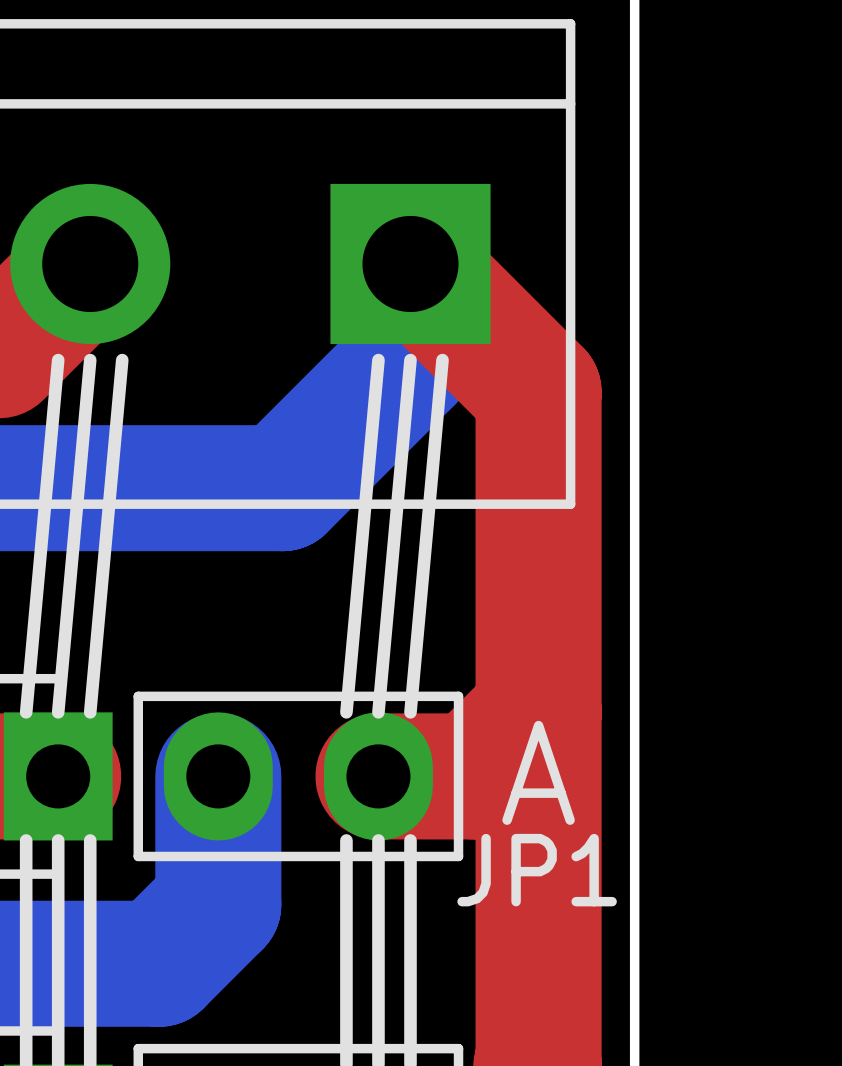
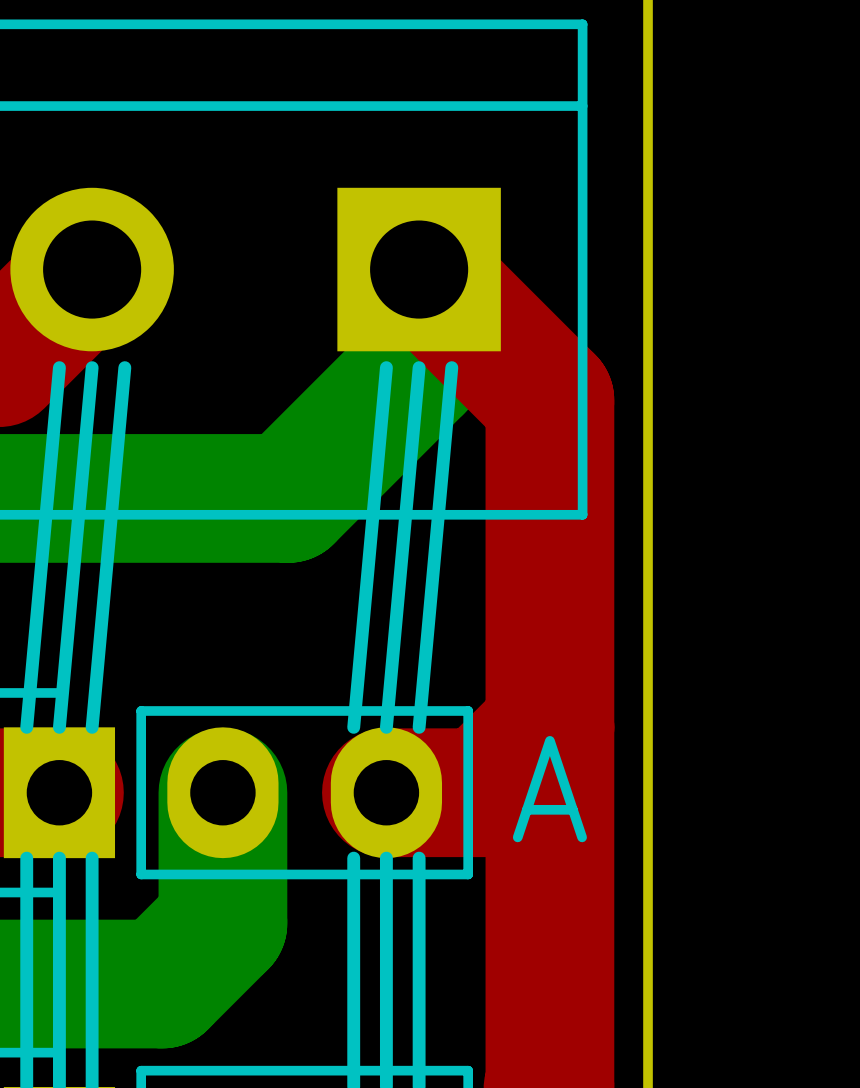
JP1 name: JP1 (537, 870) -> none

